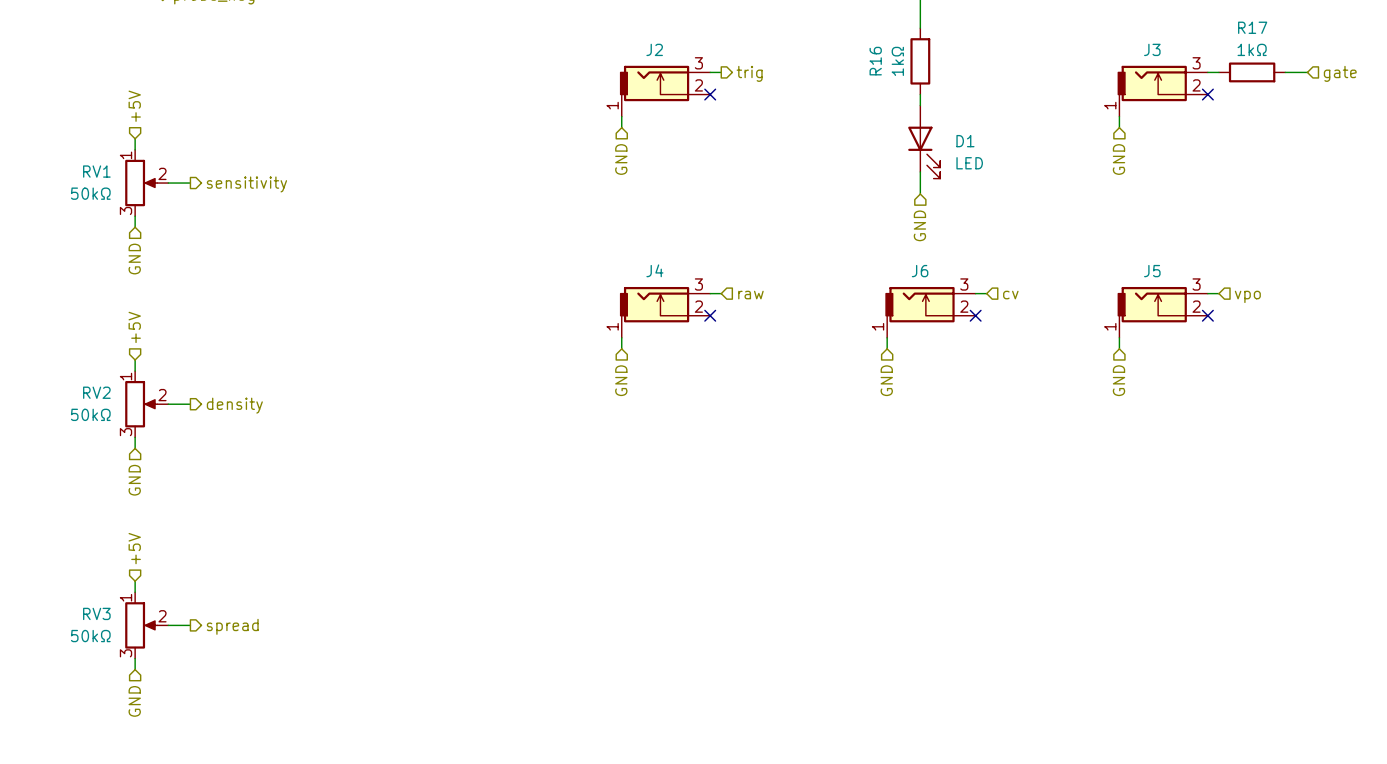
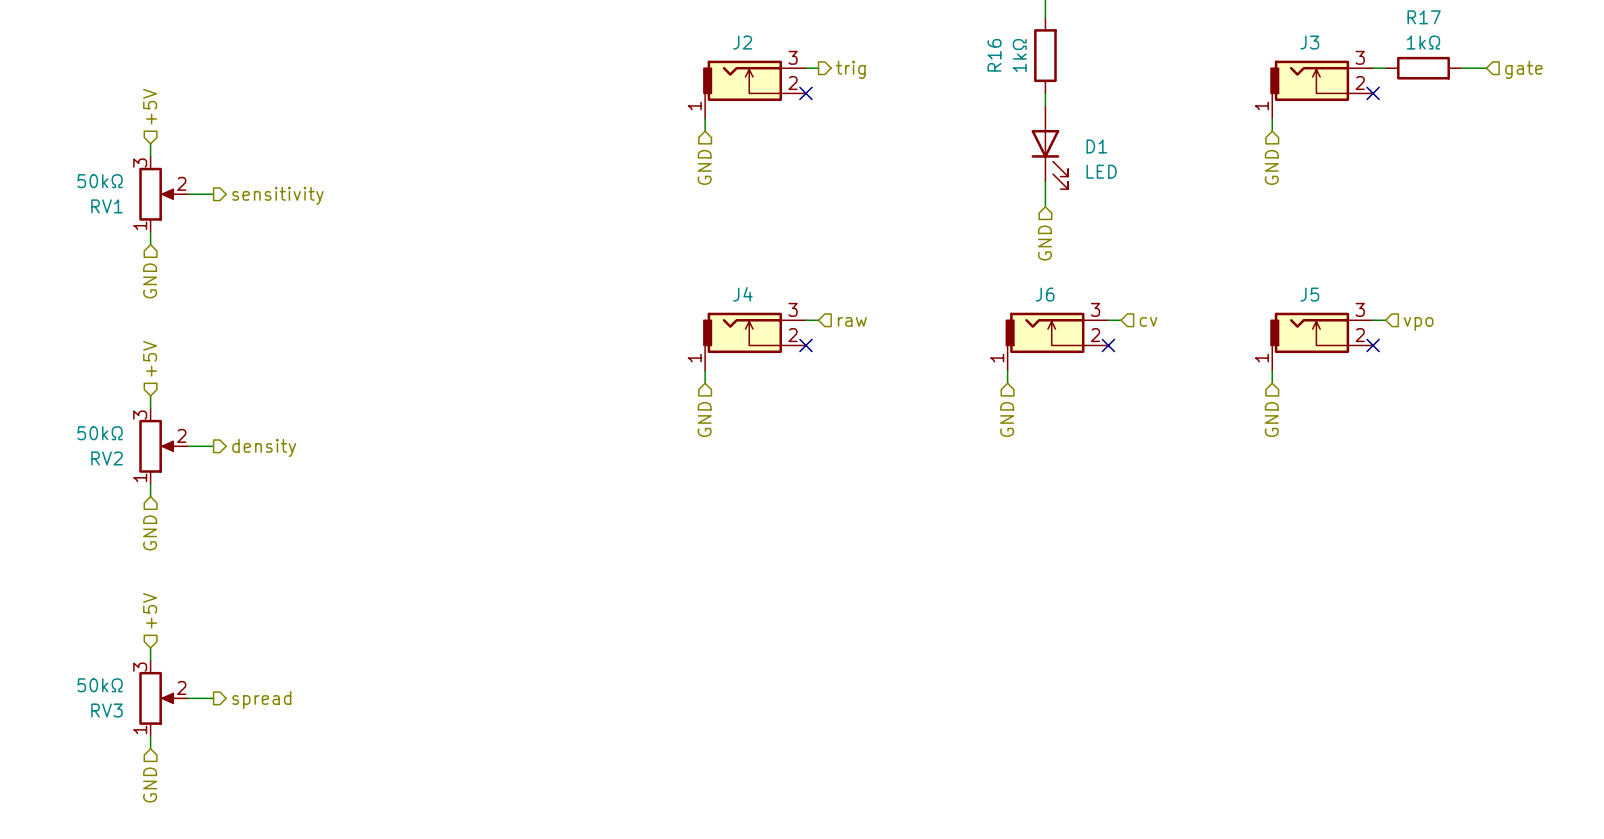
RV1 flip: as is (141, 183) -> up-down (157, 194)
RV2 flip: as is (141, 404) -> up-down (157, 446)
RV3 flip: as is (141, 625) -> up-down (157, 698)

